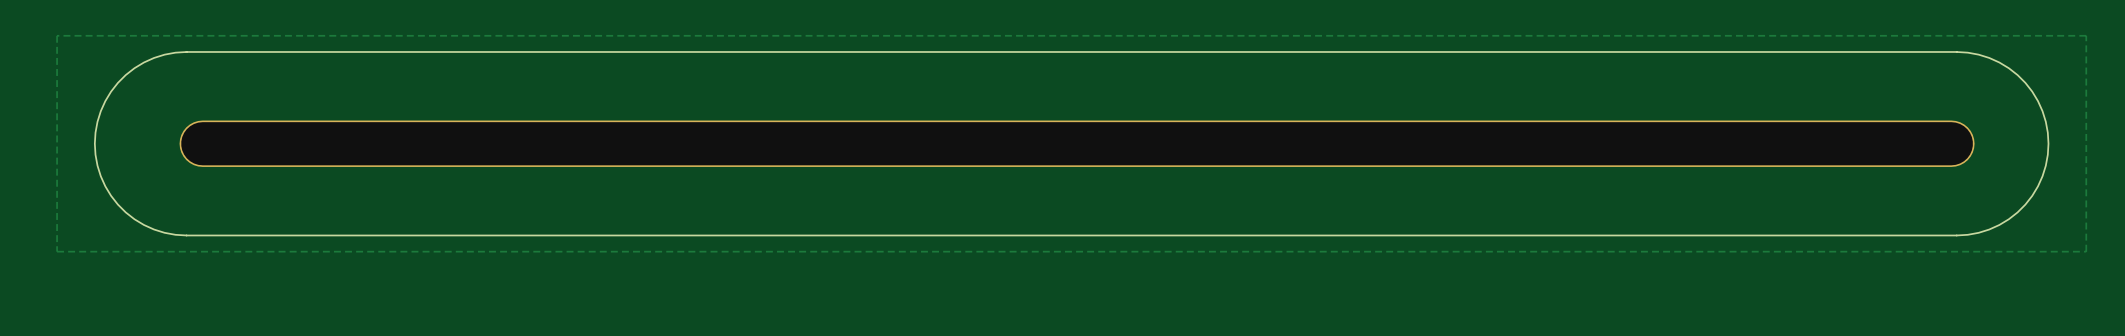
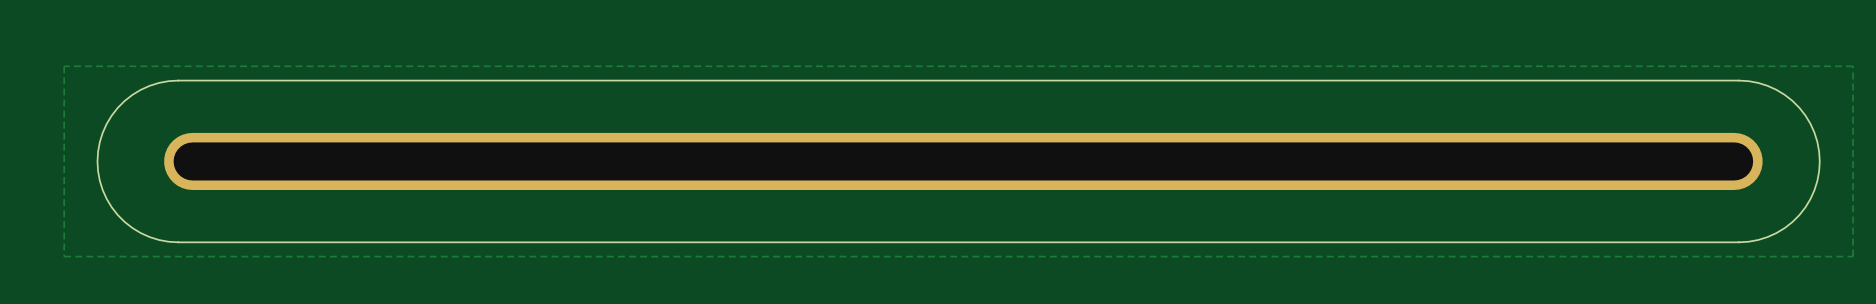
part footprint: [179, 120, 1975, 167] -> [164, 132, 1763, 191]

